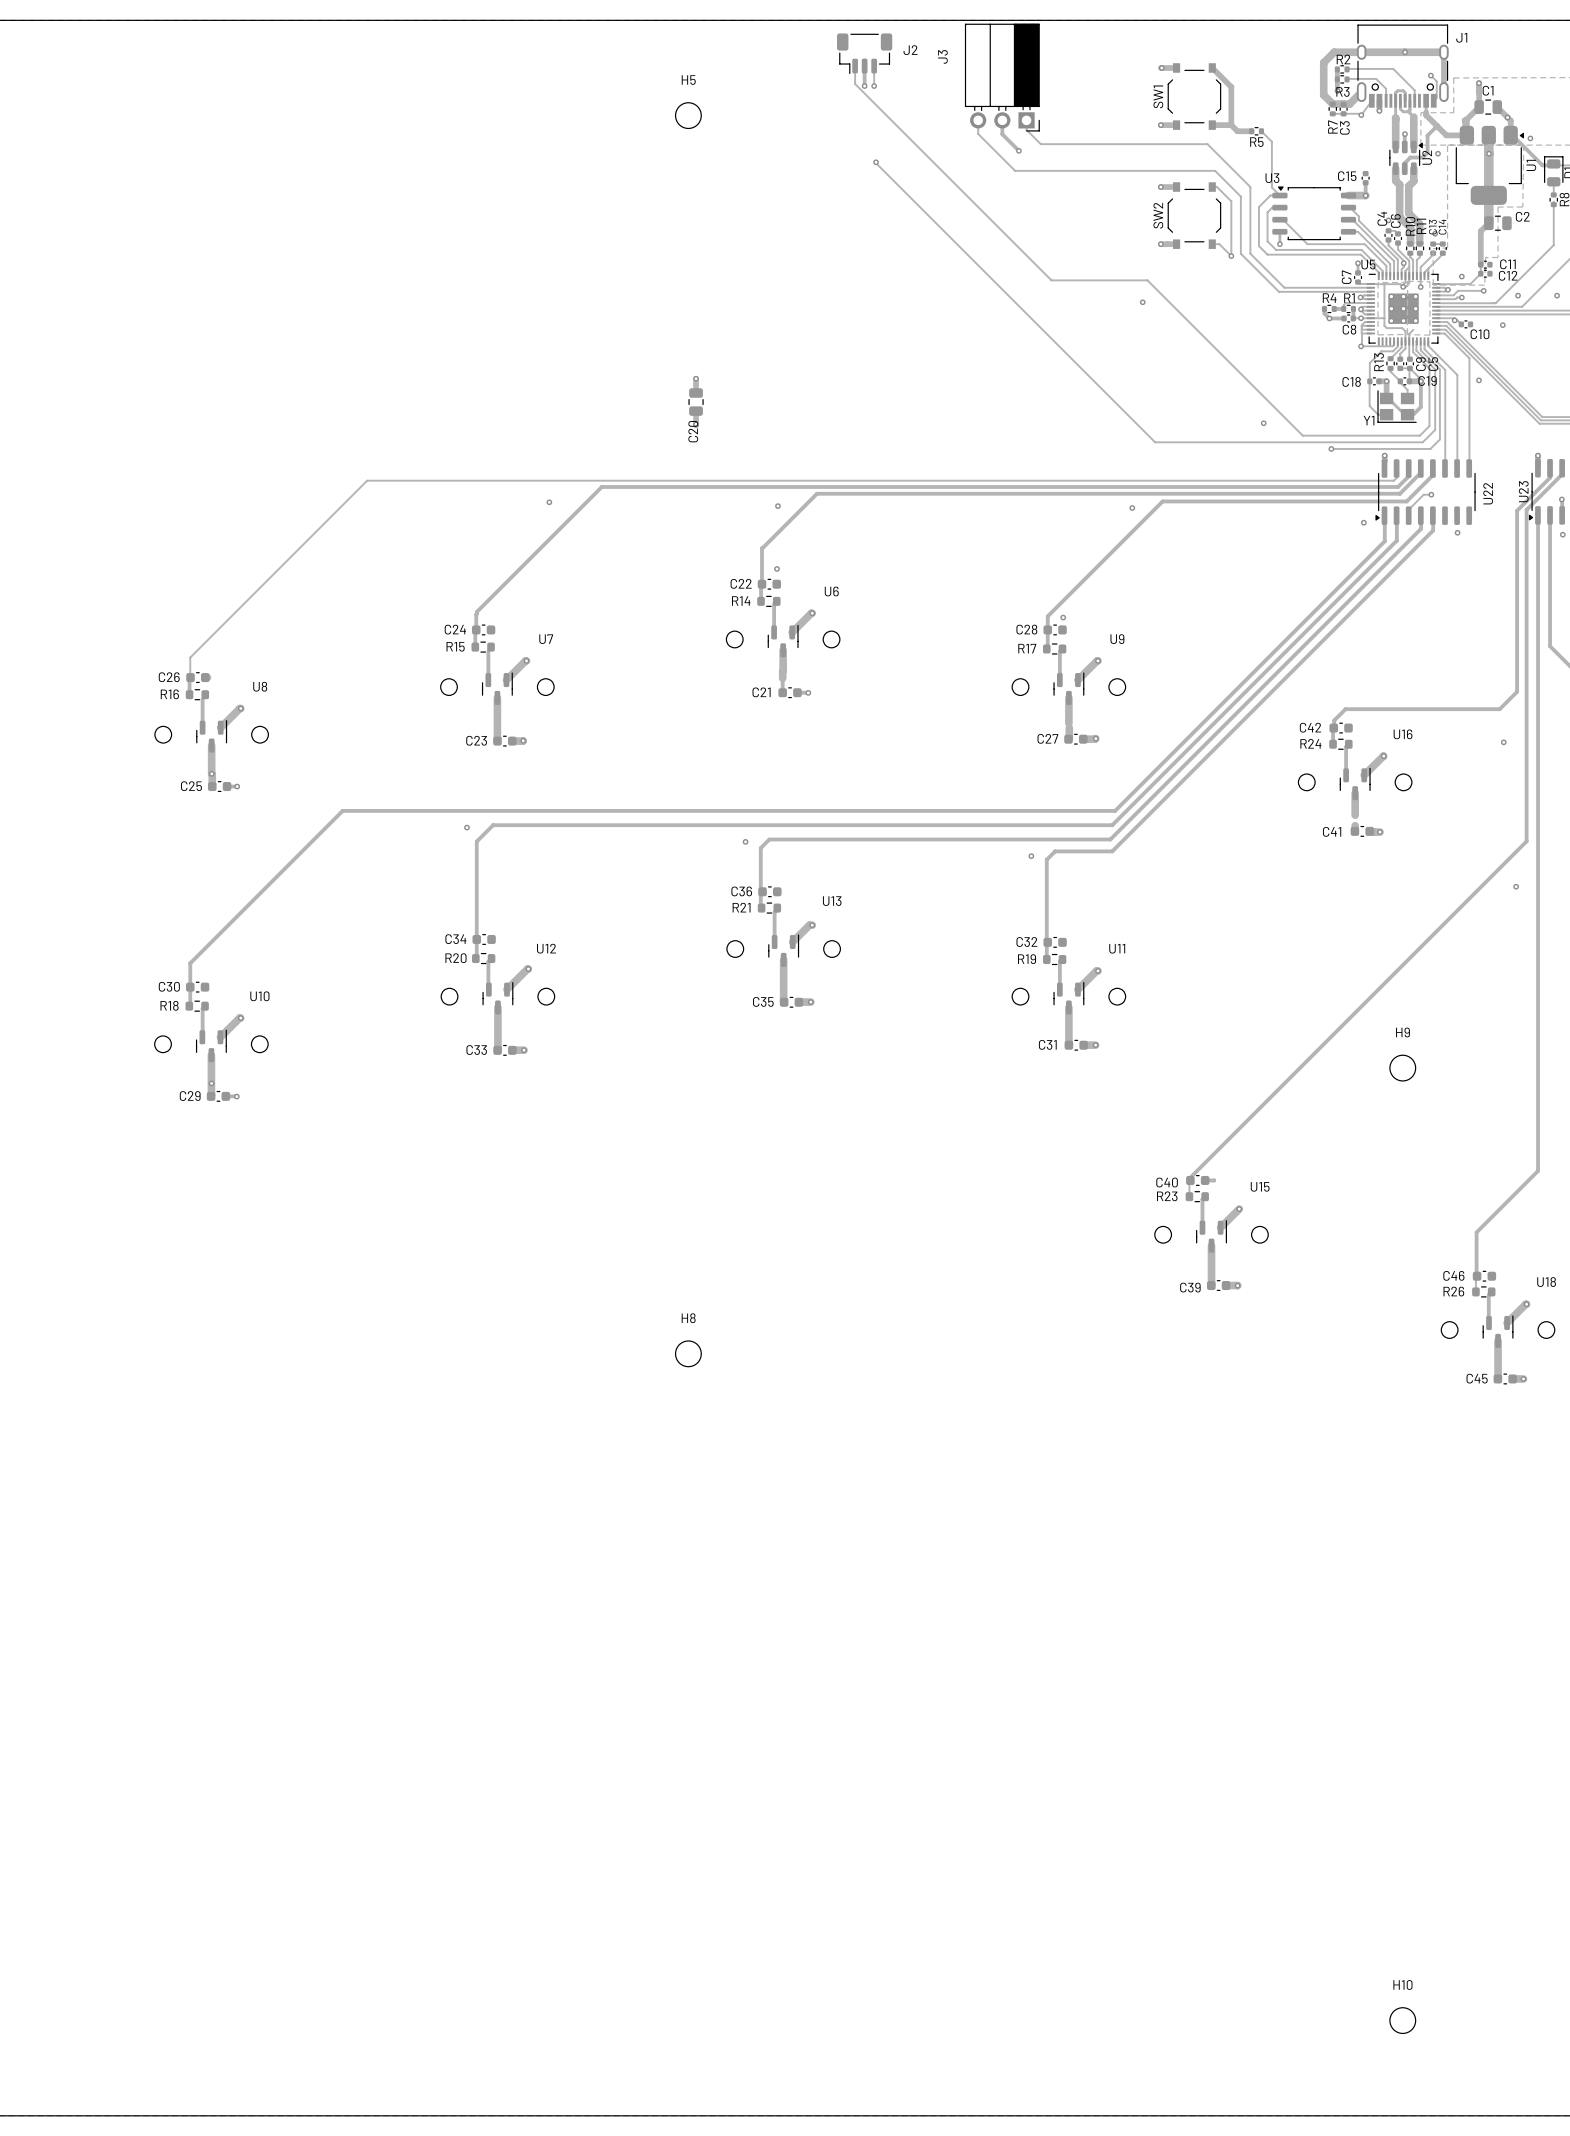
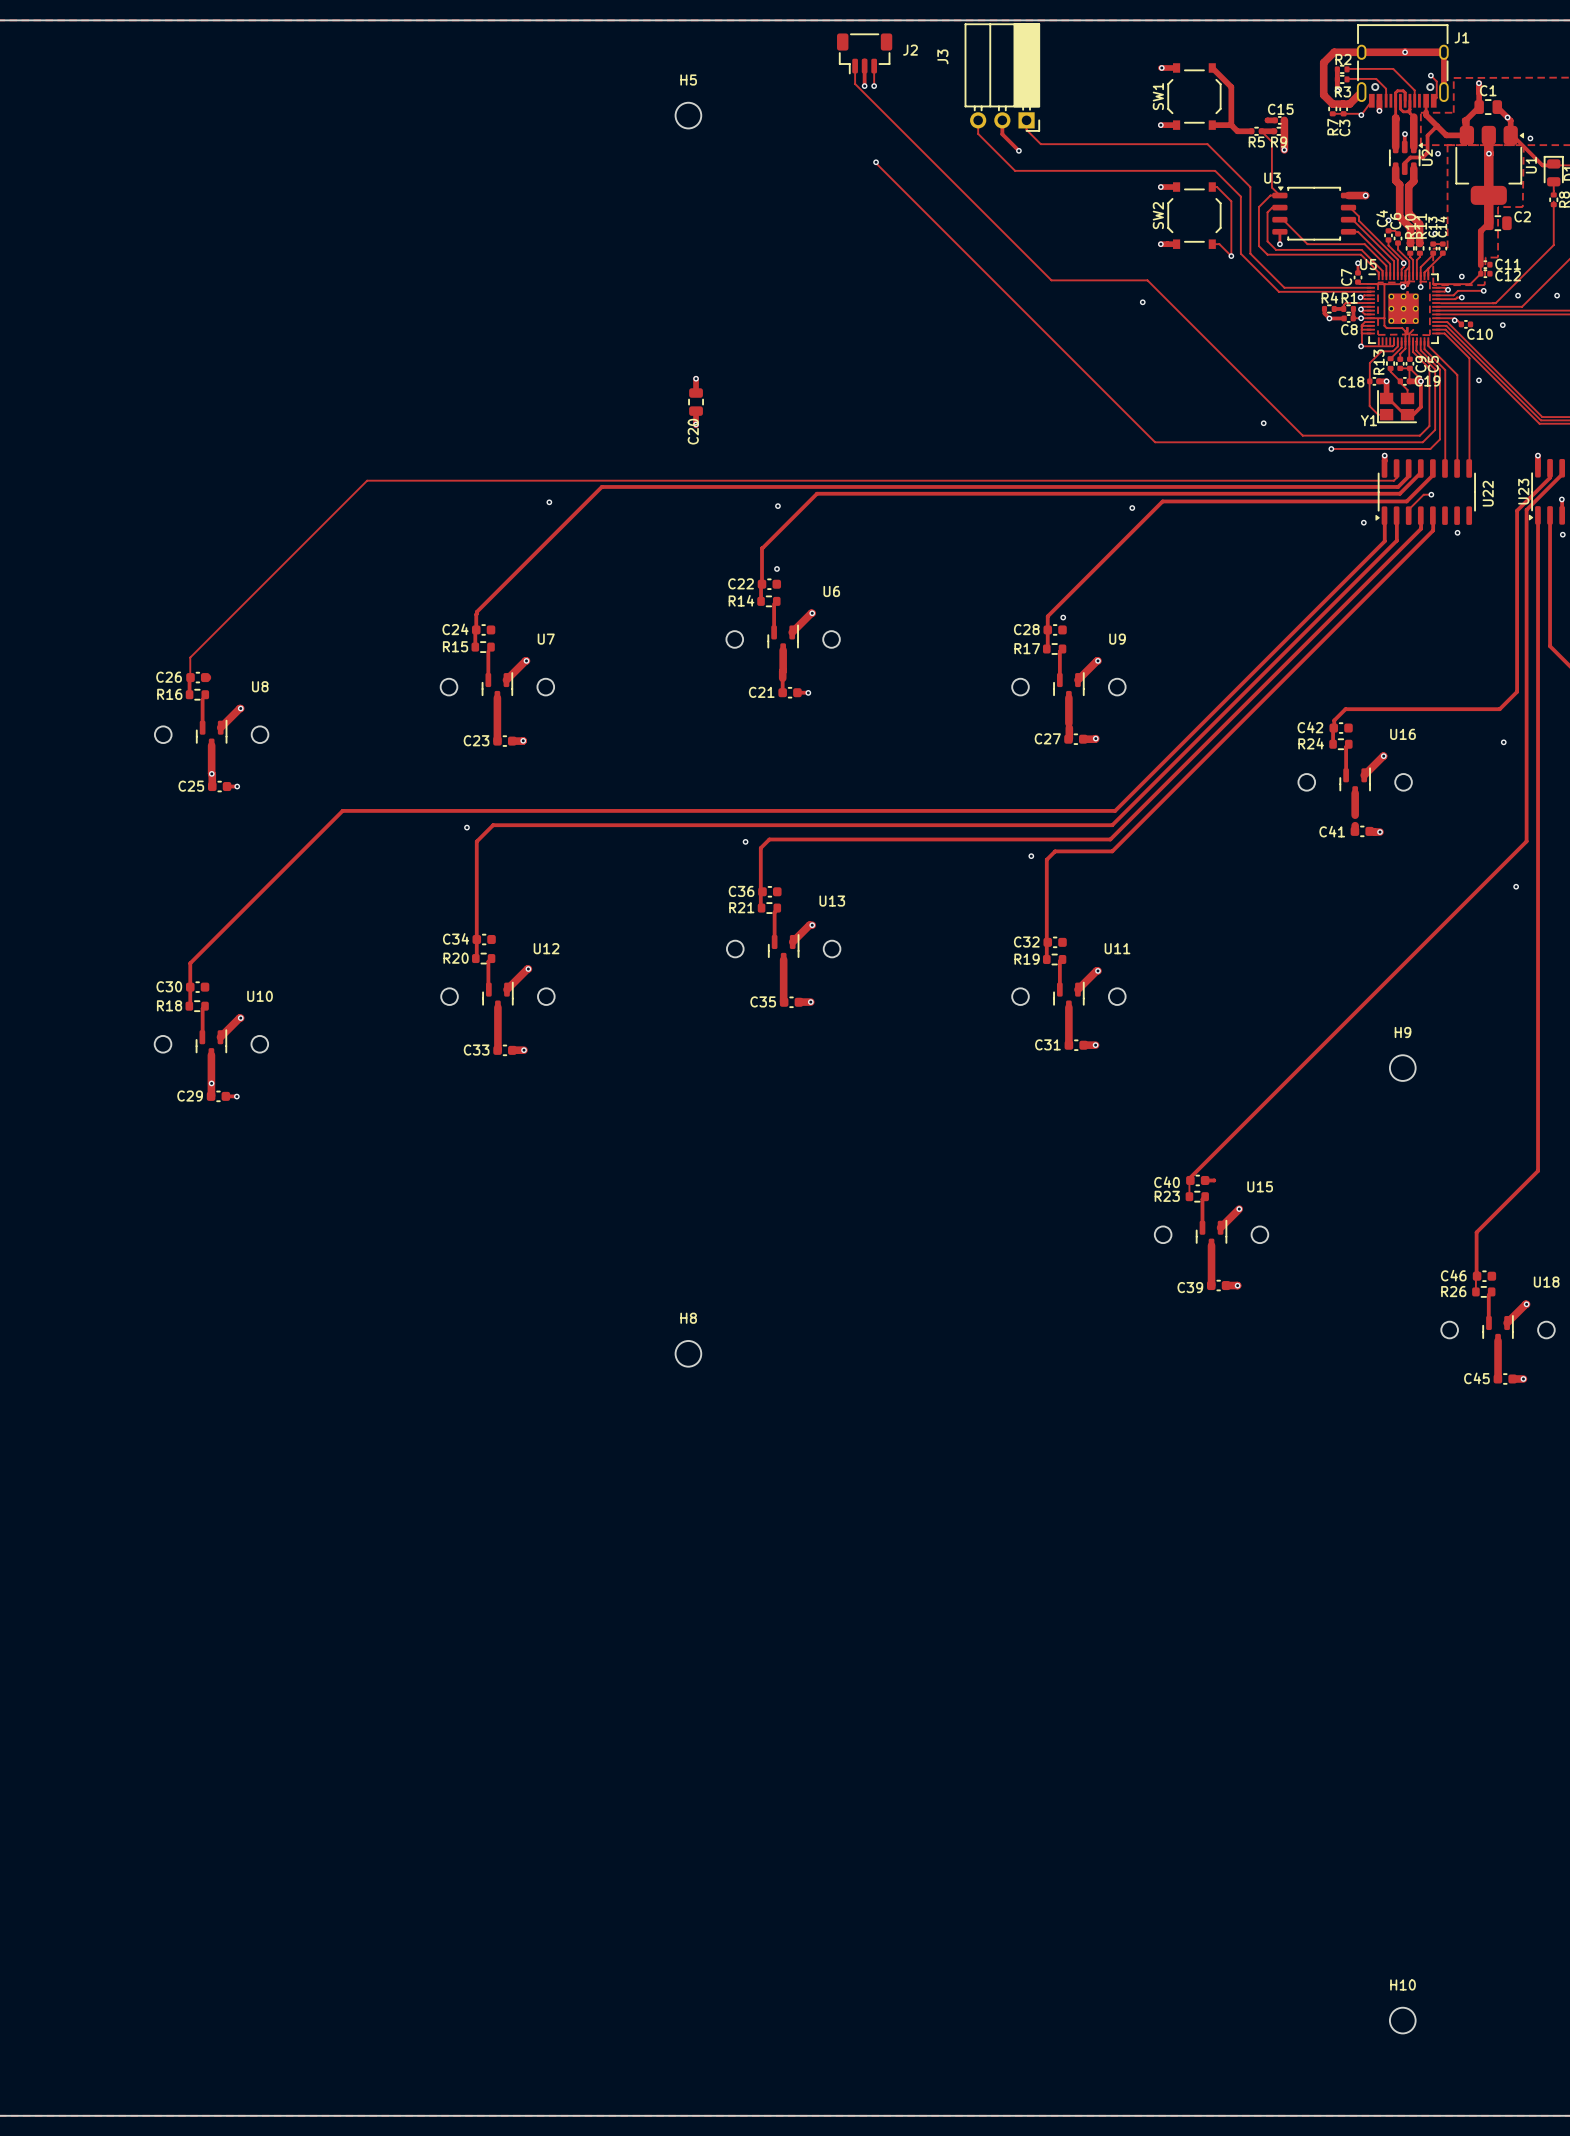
track: none -> (1267, 120) (1275, 120)
track: none -> (1284, 120) (1284, 149)
track: none -> (1261, 131) (1274, 131)
R9: none -> (1278, 131)
via: none -> (1284, 149)
C15 rotation: 0° (1365, 178) -> 90° clockwise (1279, 120)
C15 position: (1365, 178) -> (1279, 120)
track: (1365, 182) (1365, 195) -> none

